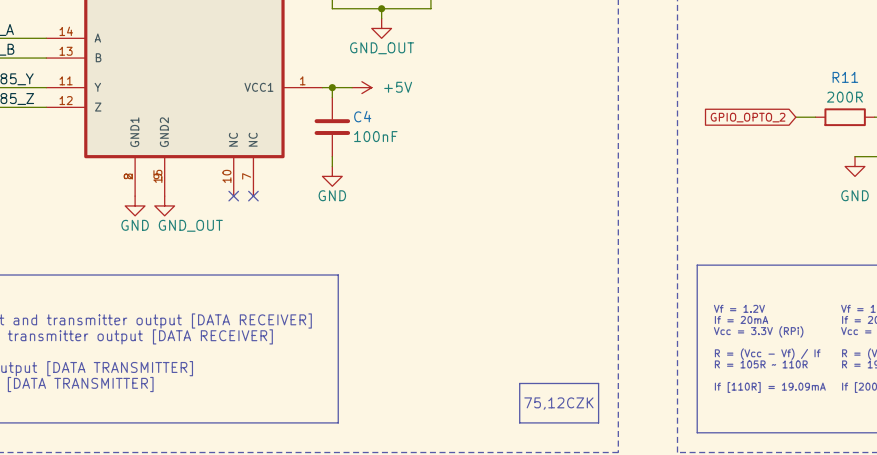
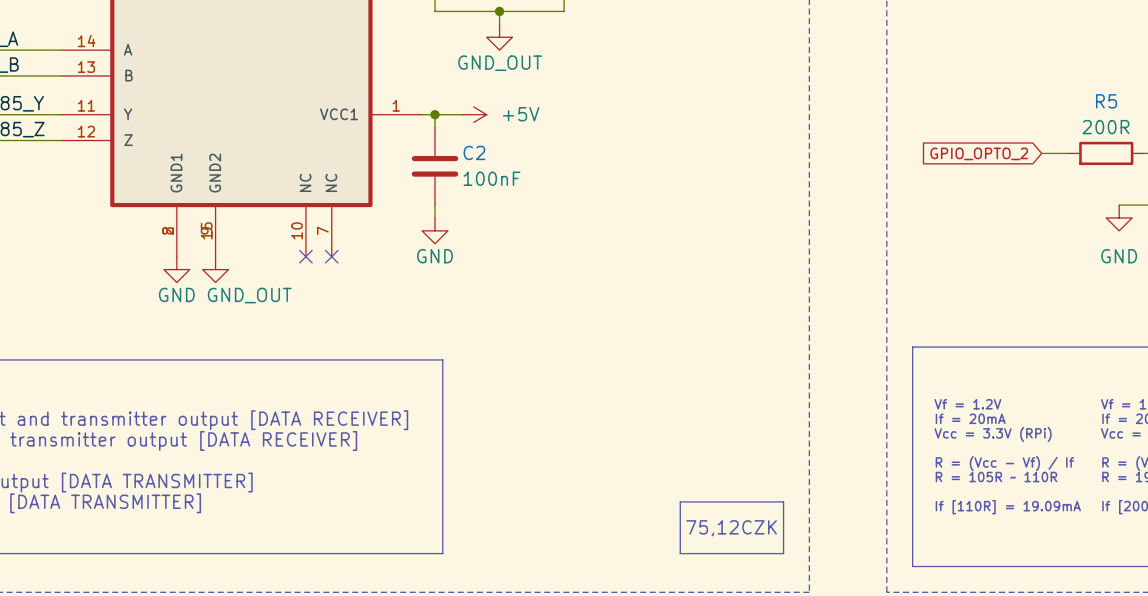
R11 name: R11 (845, 77) -> R5 (1106, 101)
C4 name: C4 (362, 116) -> C2 (474, 152)

